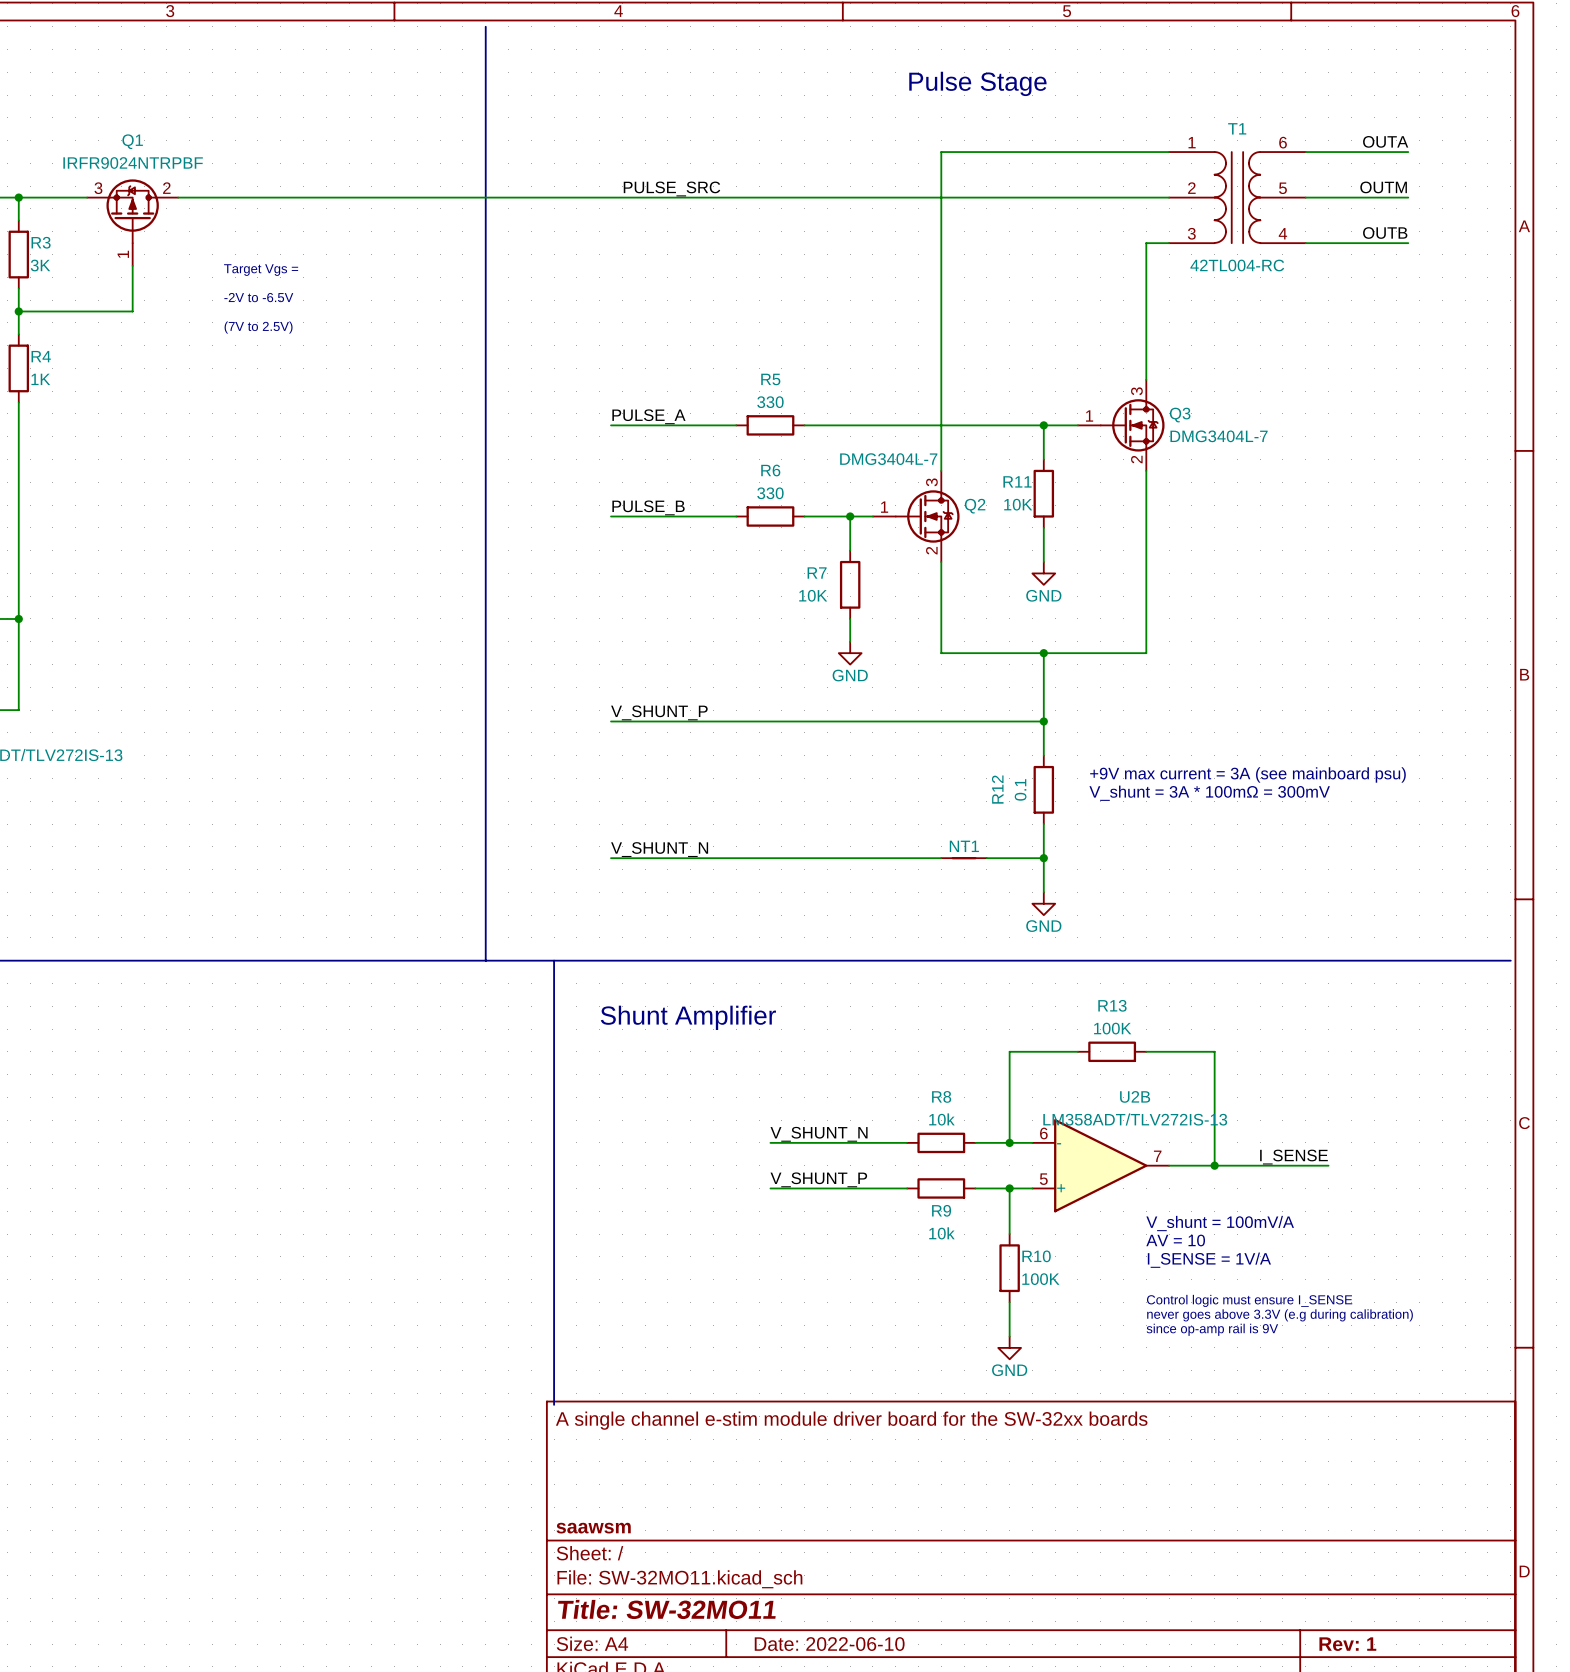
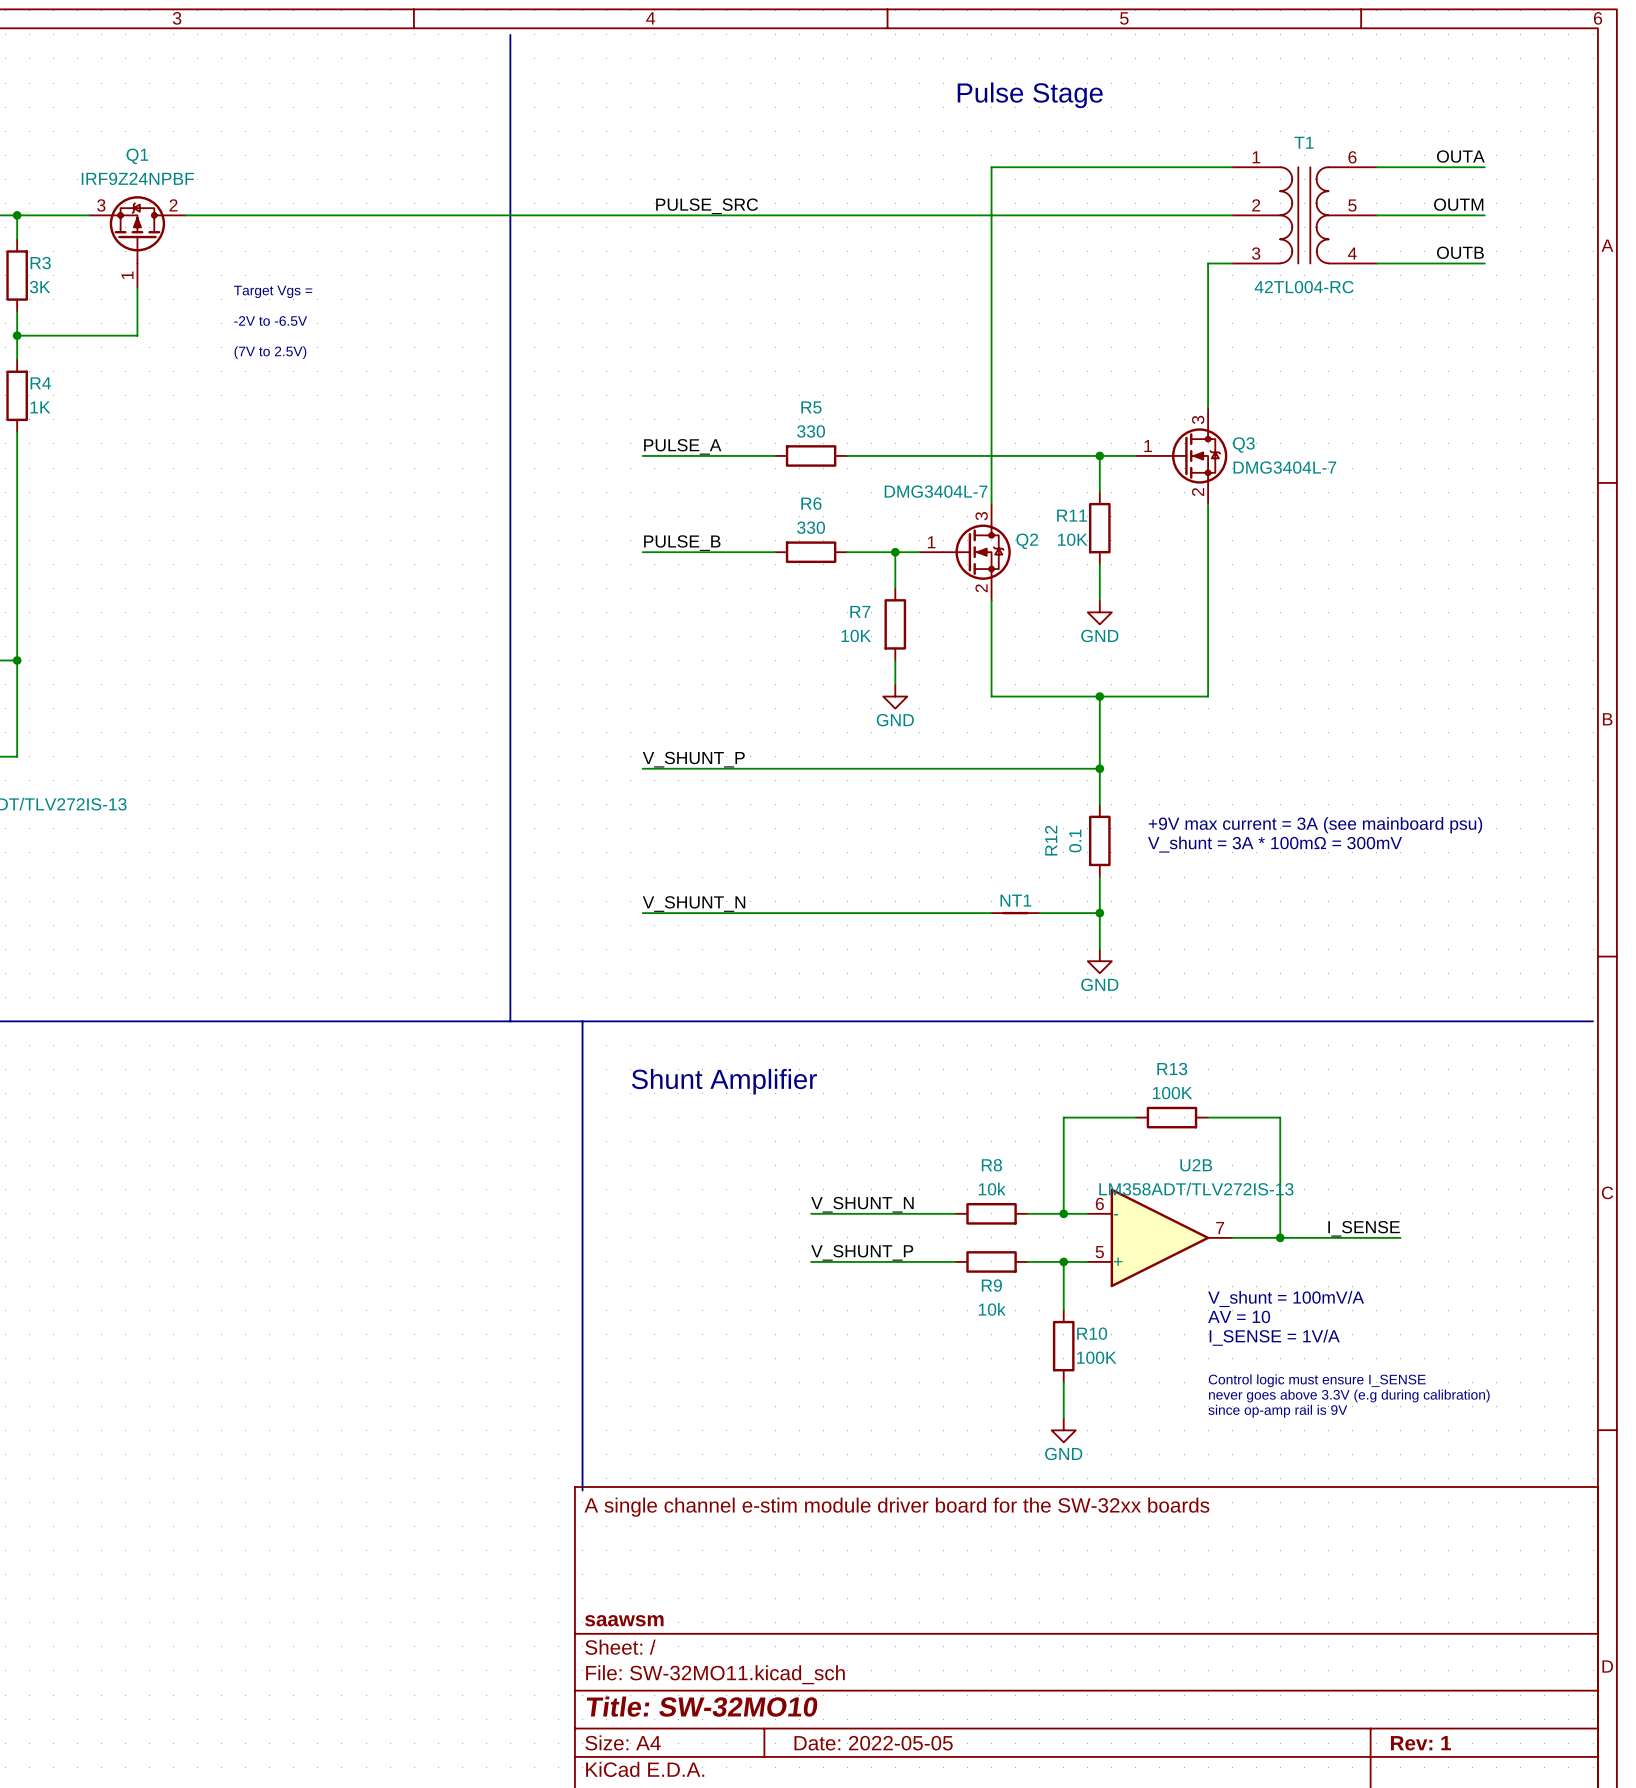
Q1 value: IRFR9024NTRPBF (133, 163) -> IRF9Z24NPBF (137, 178)
title block: Title: SW-32MO11 (666, 1609) -> Title: SW-32MO10 (702, 1706)
title block: Date: 2022-06-10 (829, 1644) -> Date: 2022-05-05 (873, 1743)

